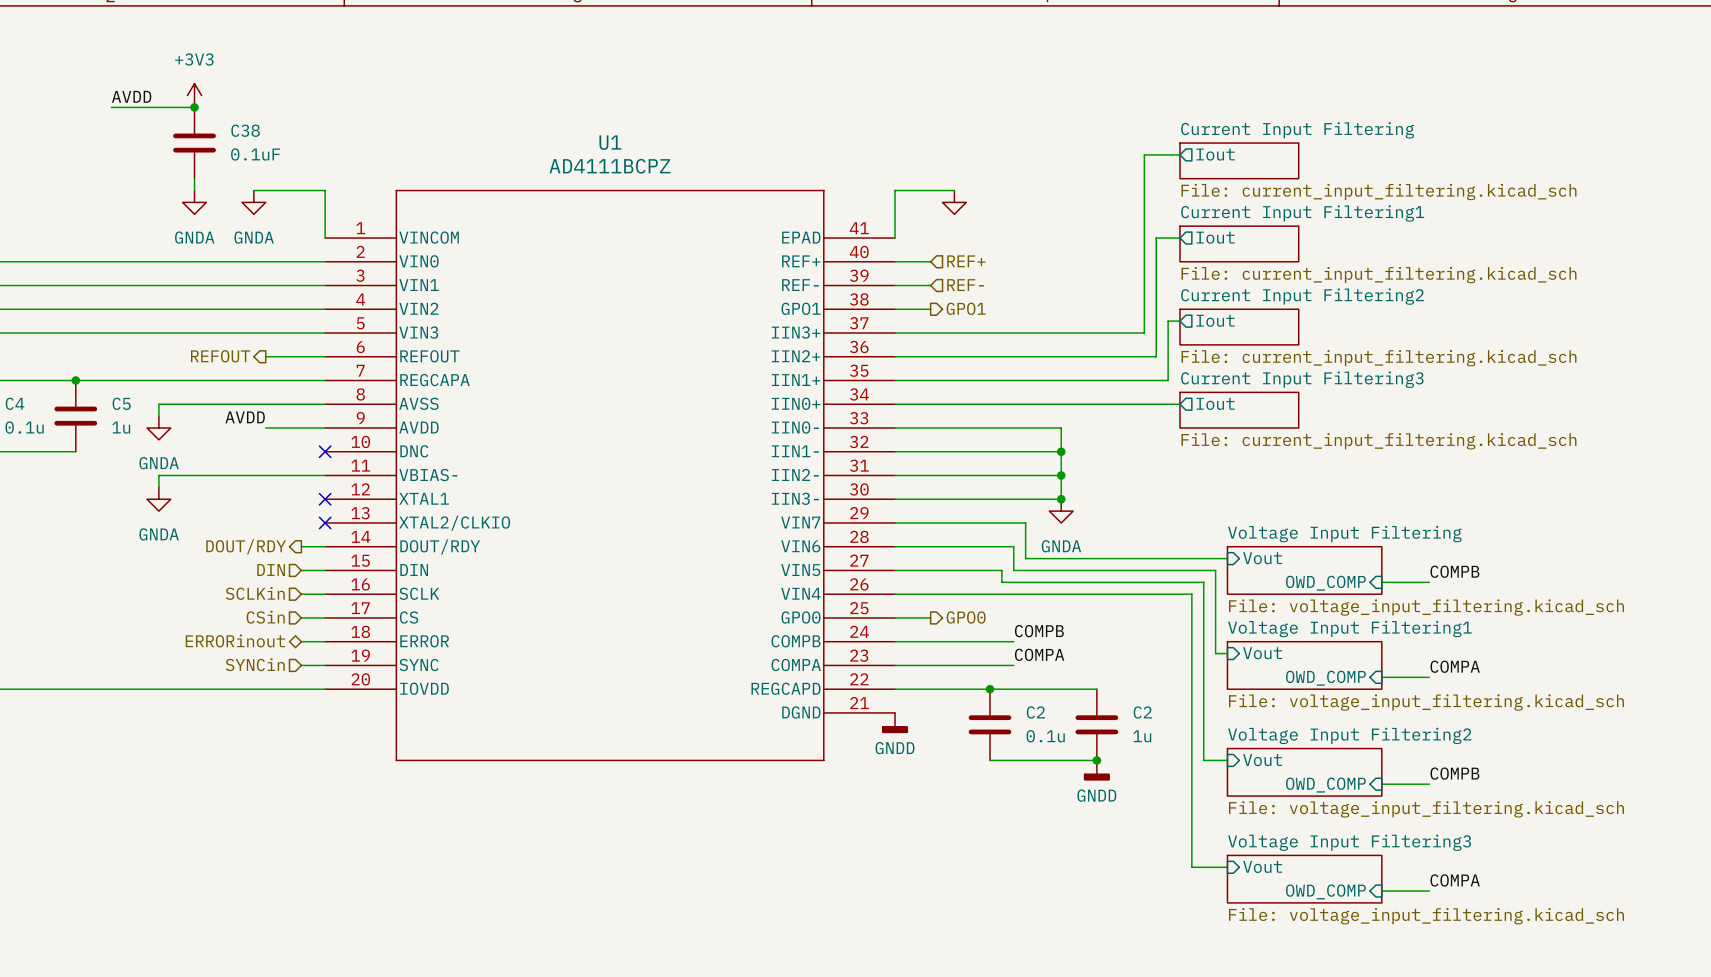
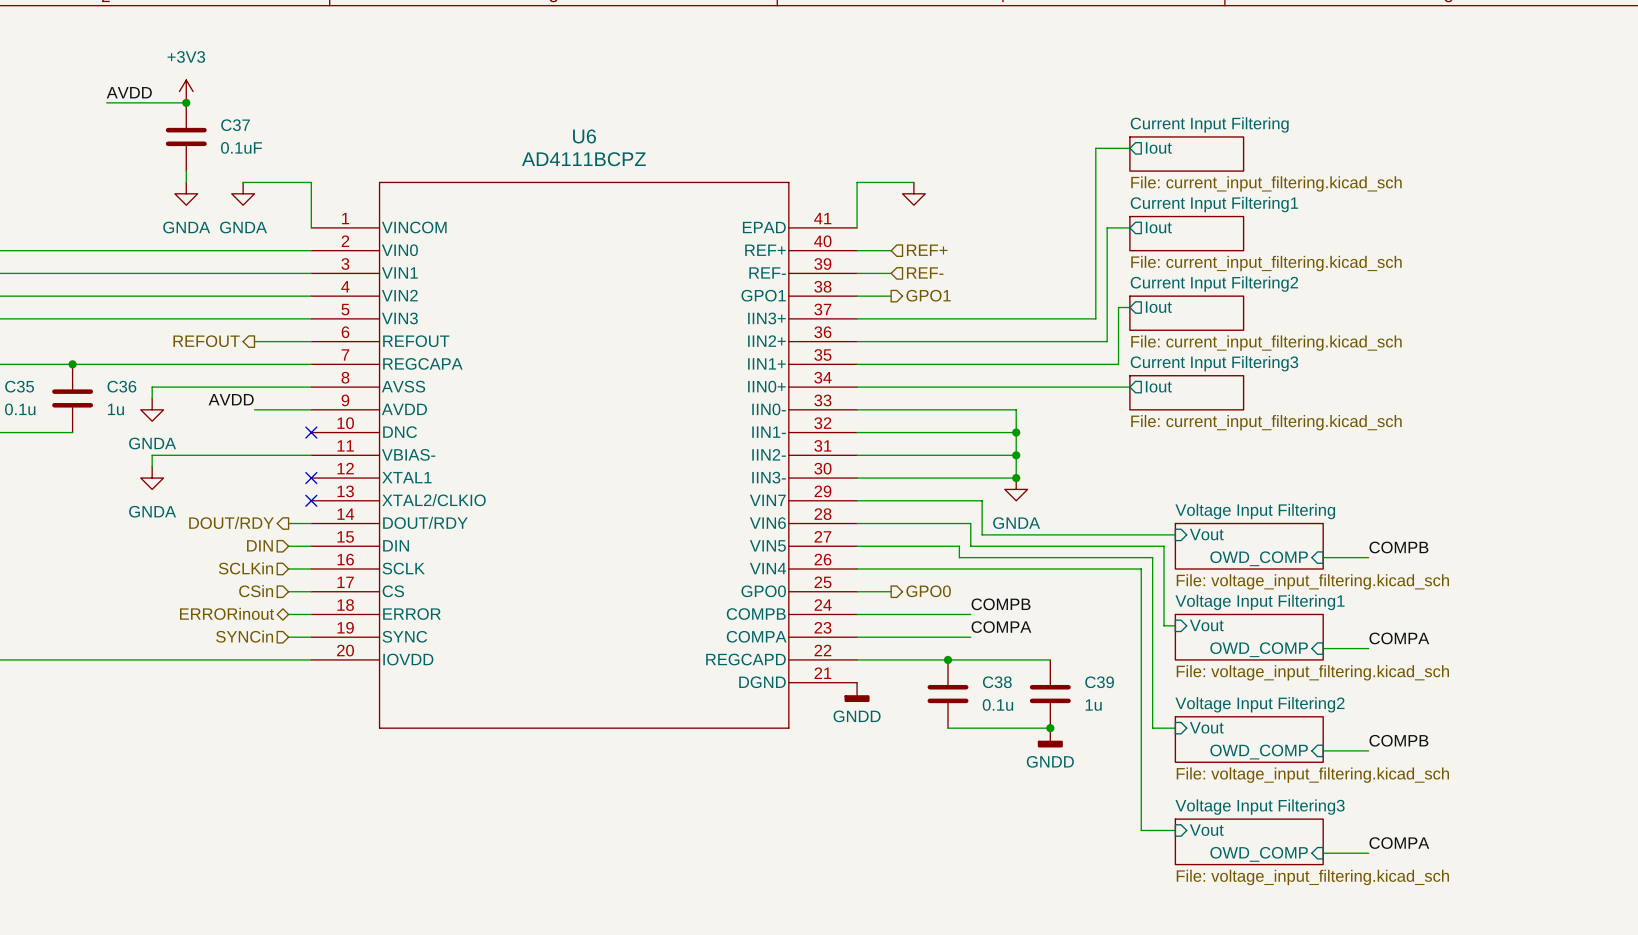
C38 name: C38 (245, 130) -> C37 (235, 125)
U1 name: U1 (610, 142) -> U6 (584, 136)
C4 name: C4 (15, 403) -> C35 (19, 386)
C5 name: C5 (121, 403) -> C36 (121, 386)
C2 name: C2 (1035, 712) -> C38 (997, 682)
C2 name: C2 (1142, 712) -> C39 (1099, 682)

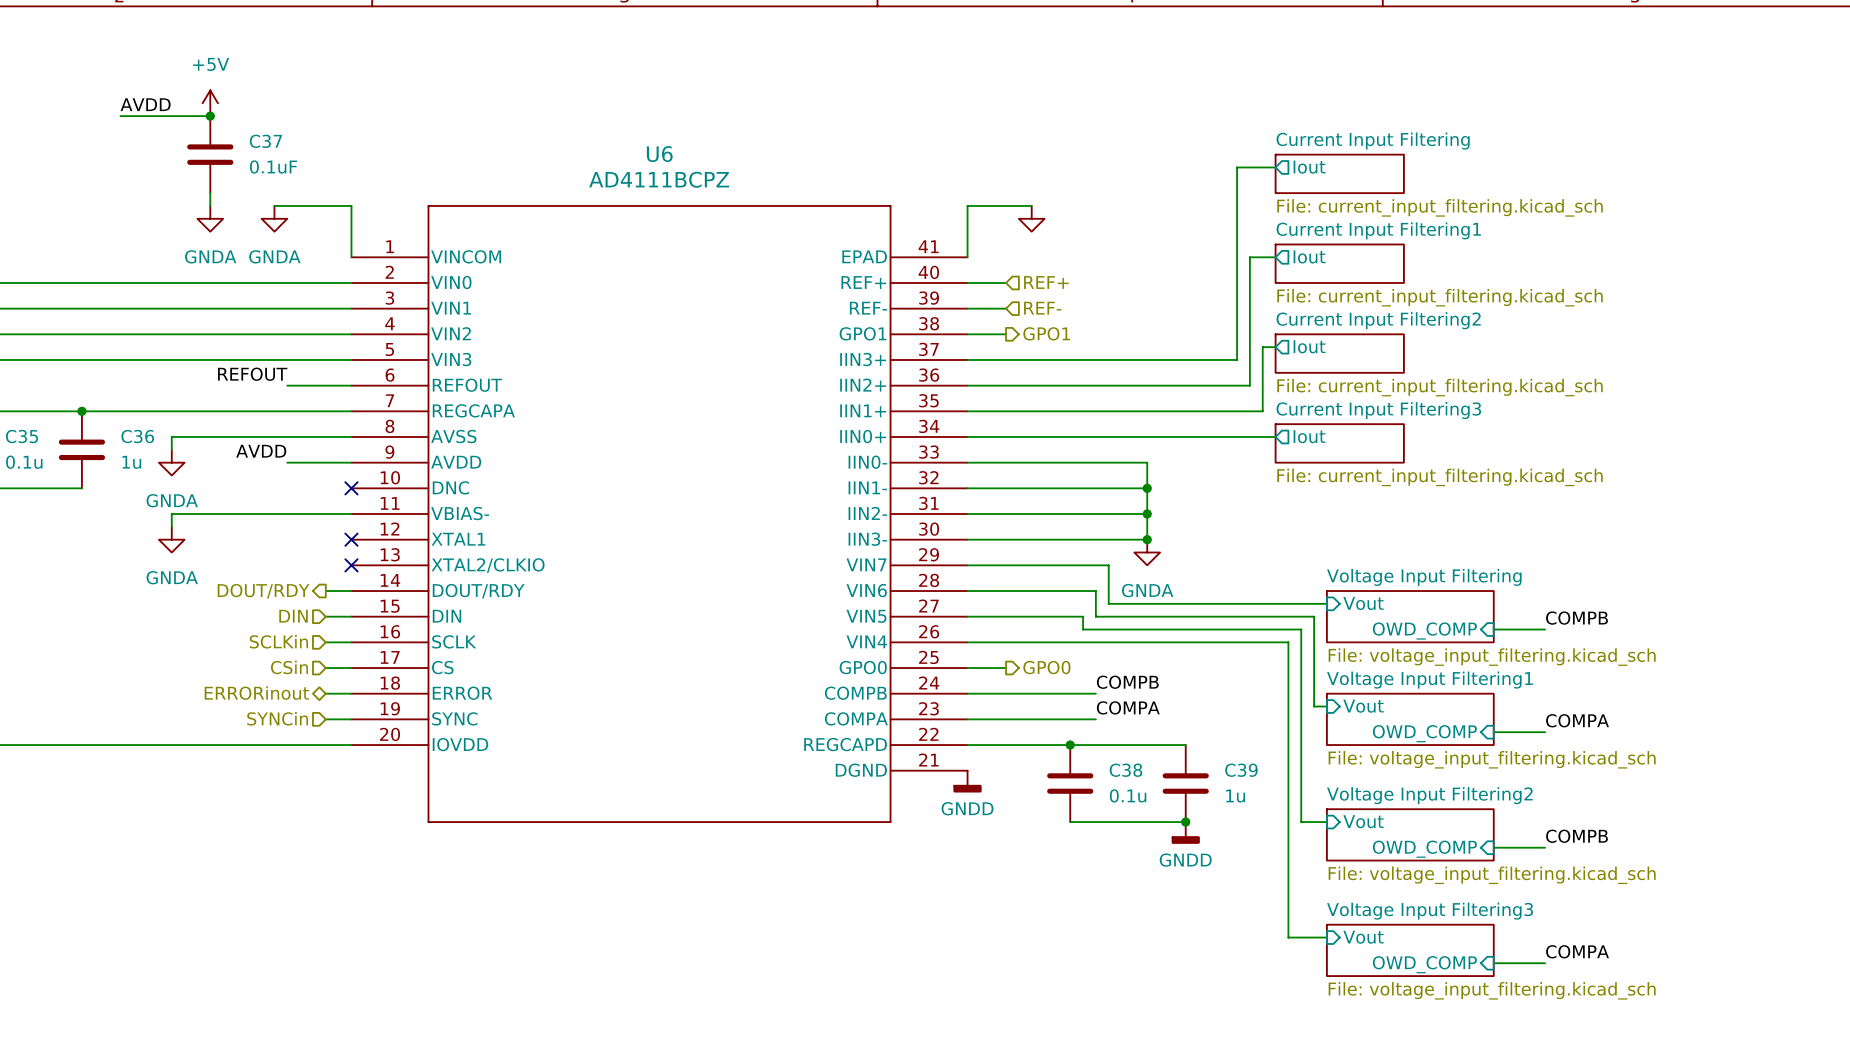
power symbol: +3V3 (186, 91) -> +5V (210, 103)
label: none -> REFOUT (252, 374)
hierarchical label: REFOUT (206, 341) -> none

